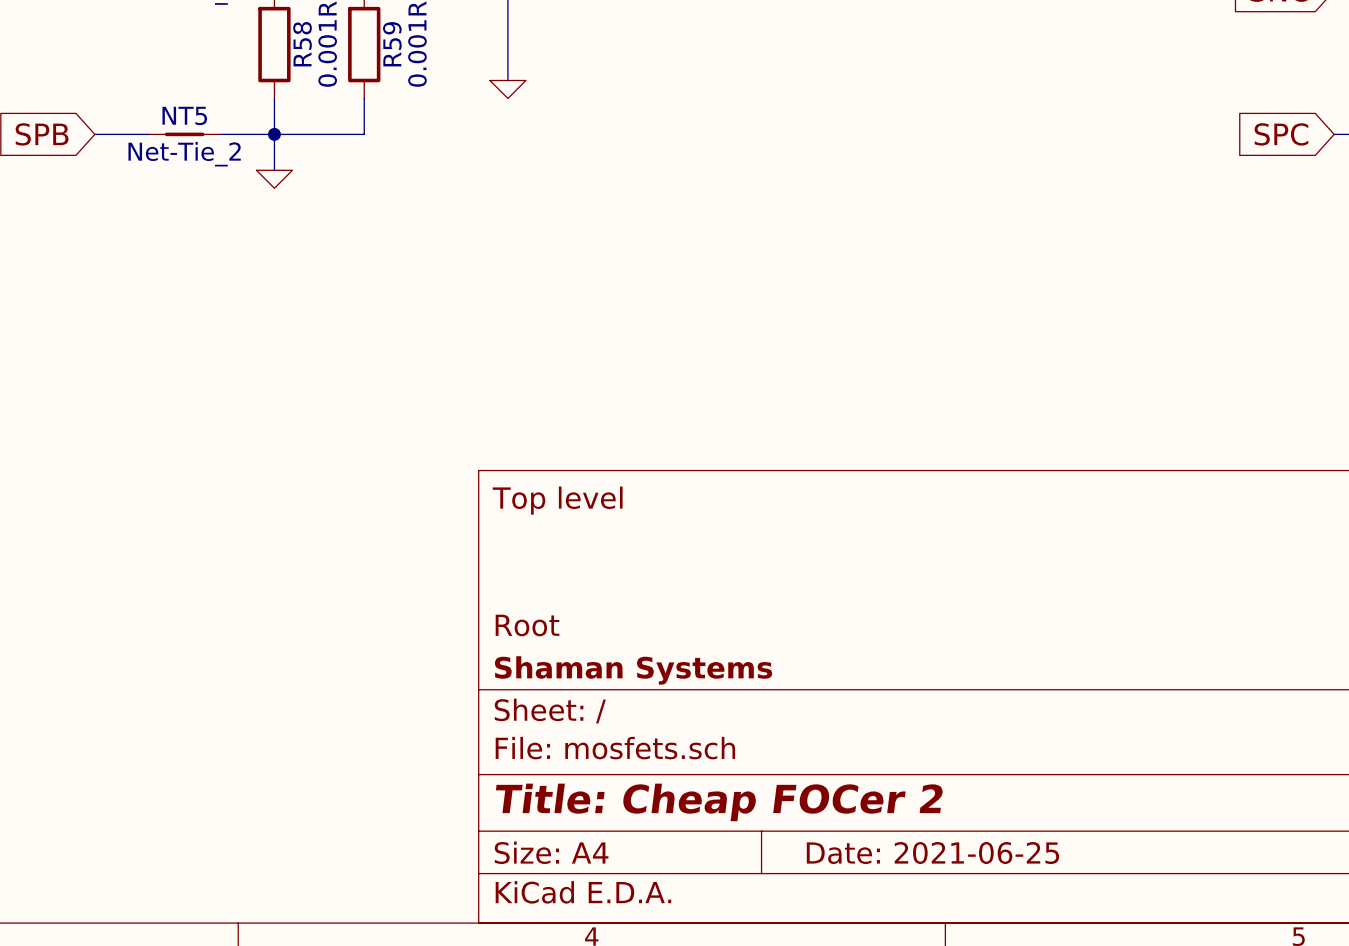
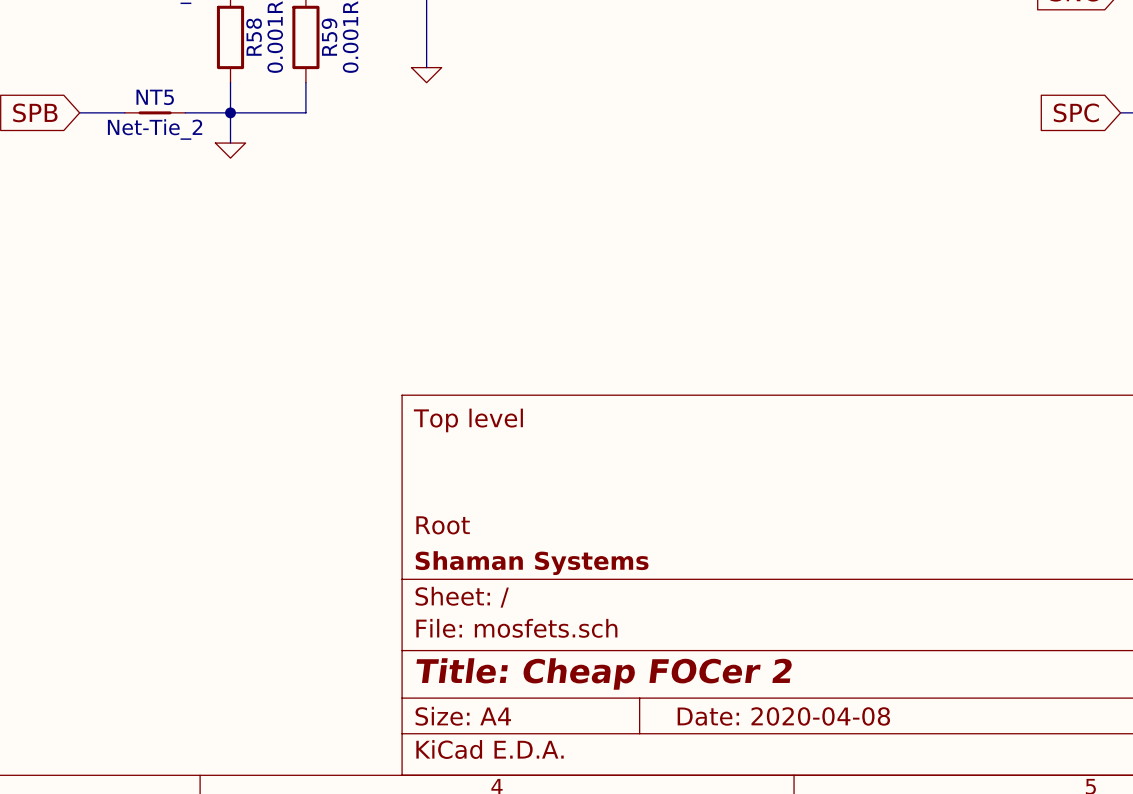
title block: Date: 2021-06-25 (932, 853) -> Date: 2020-04-08 (783, 716)

